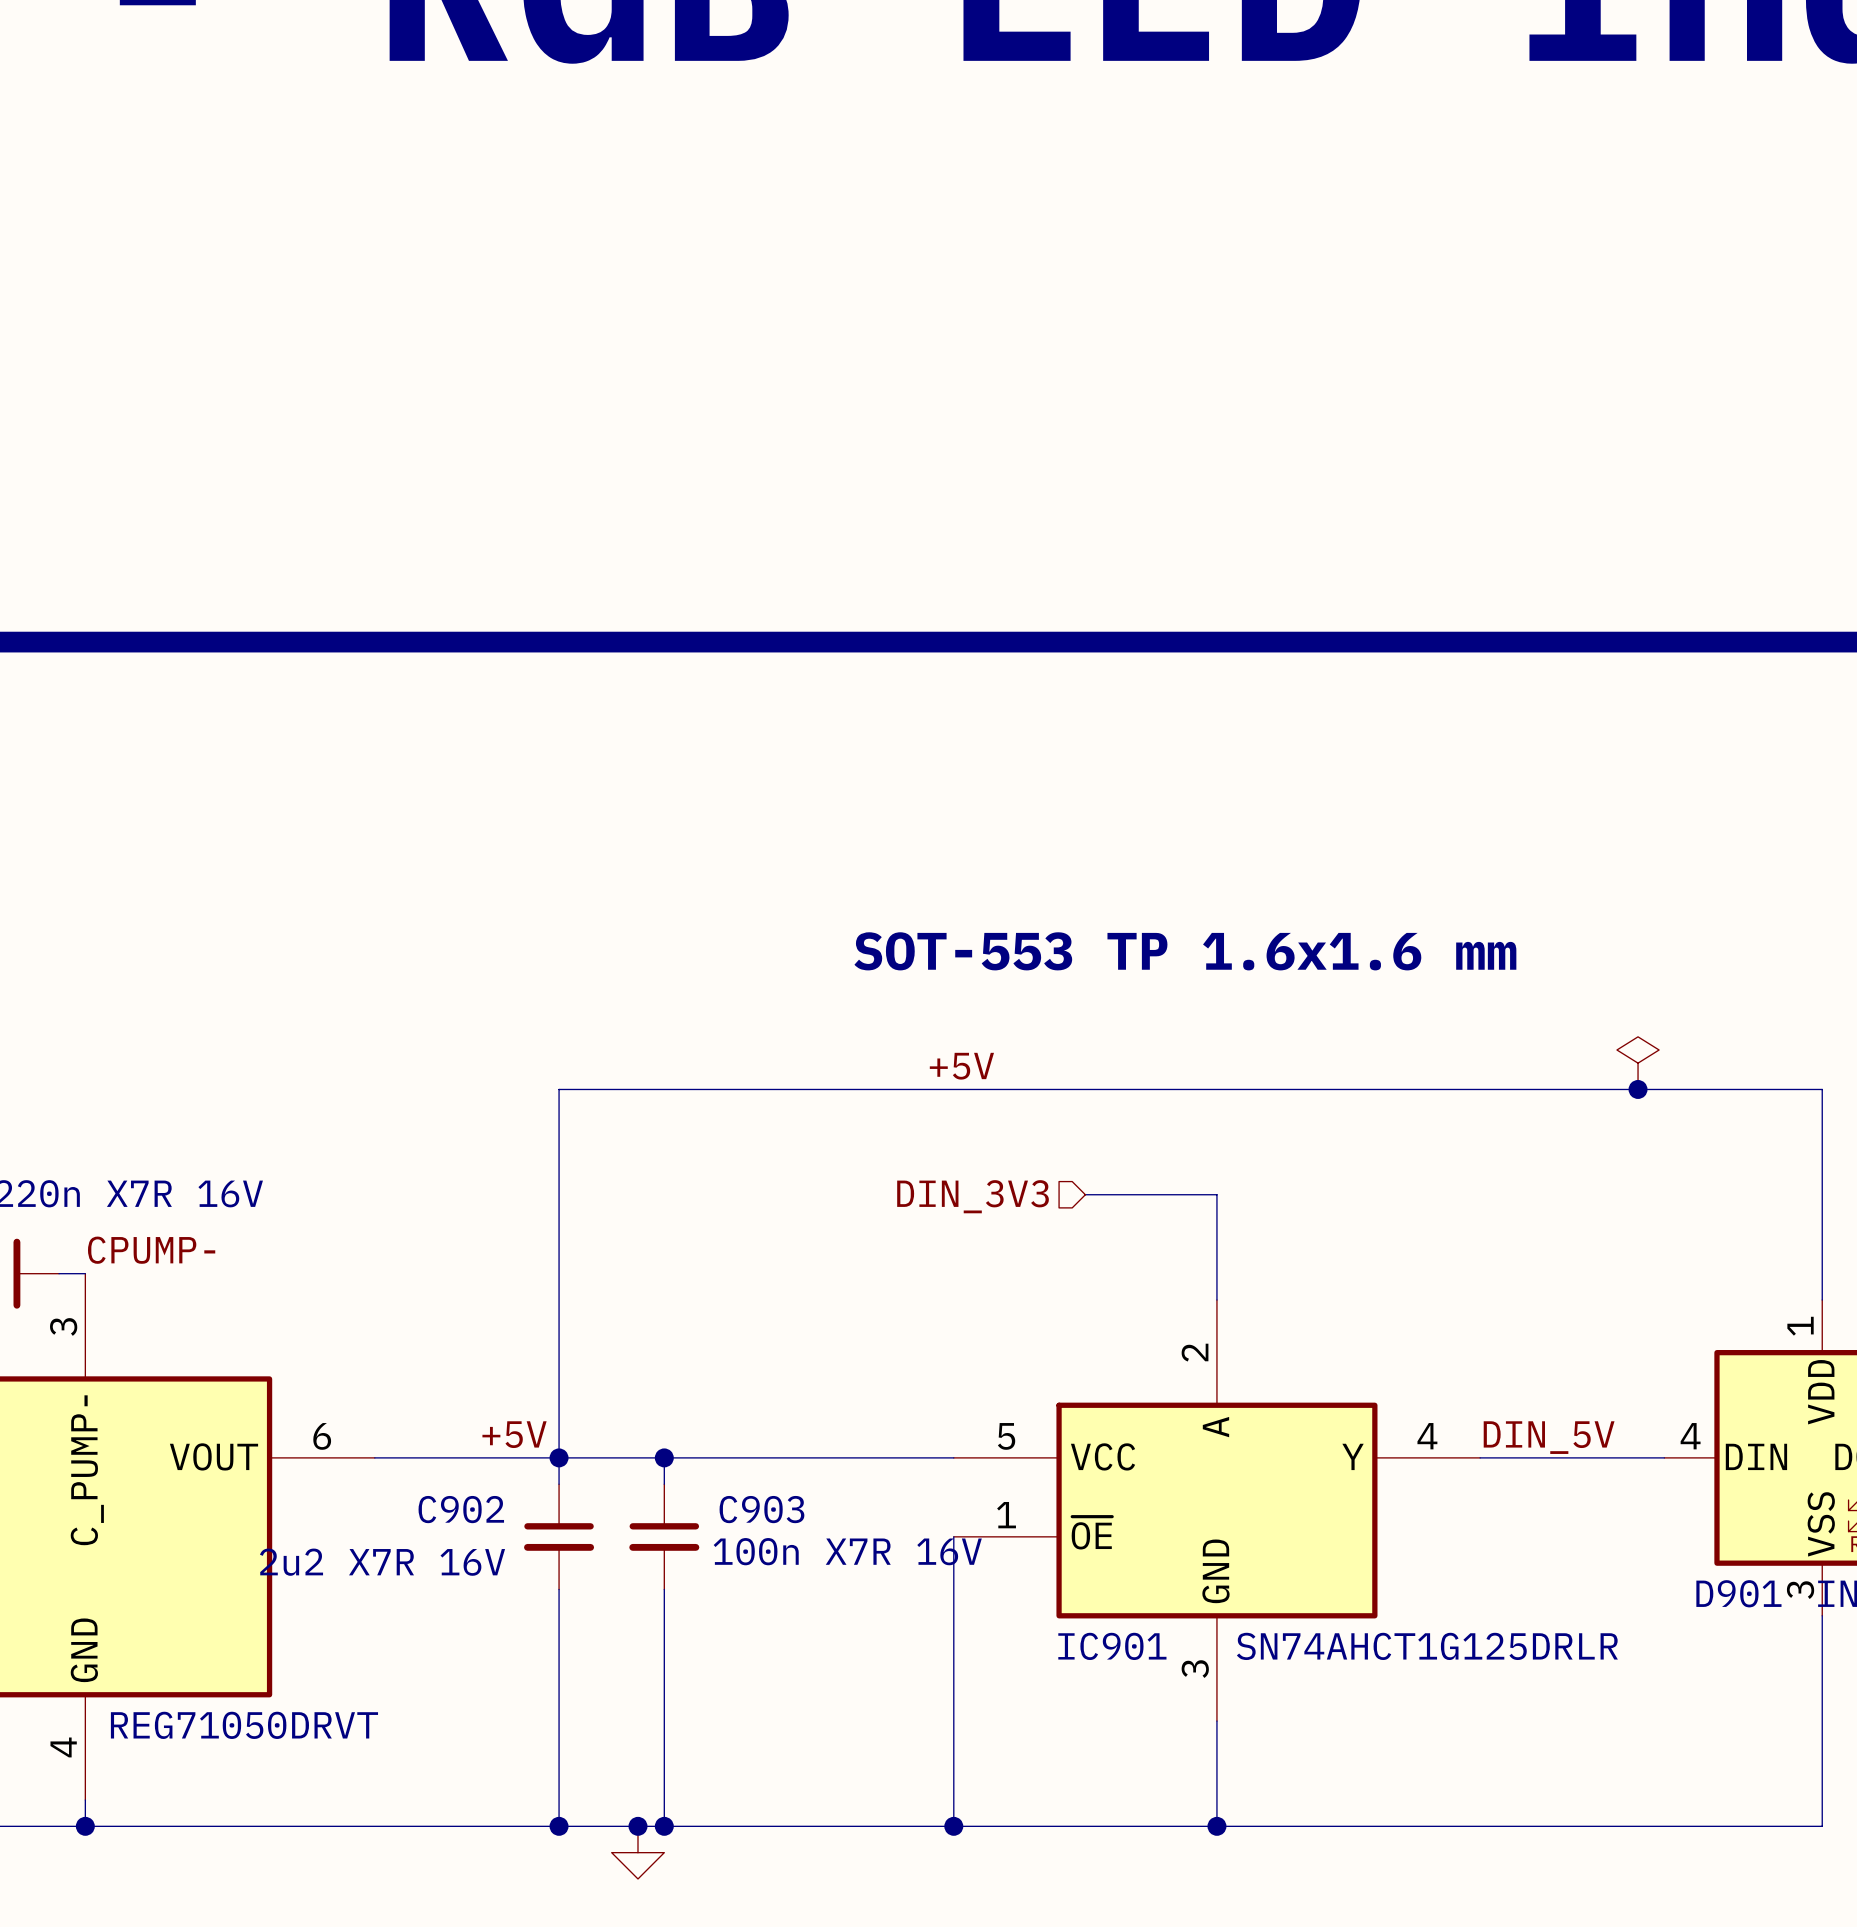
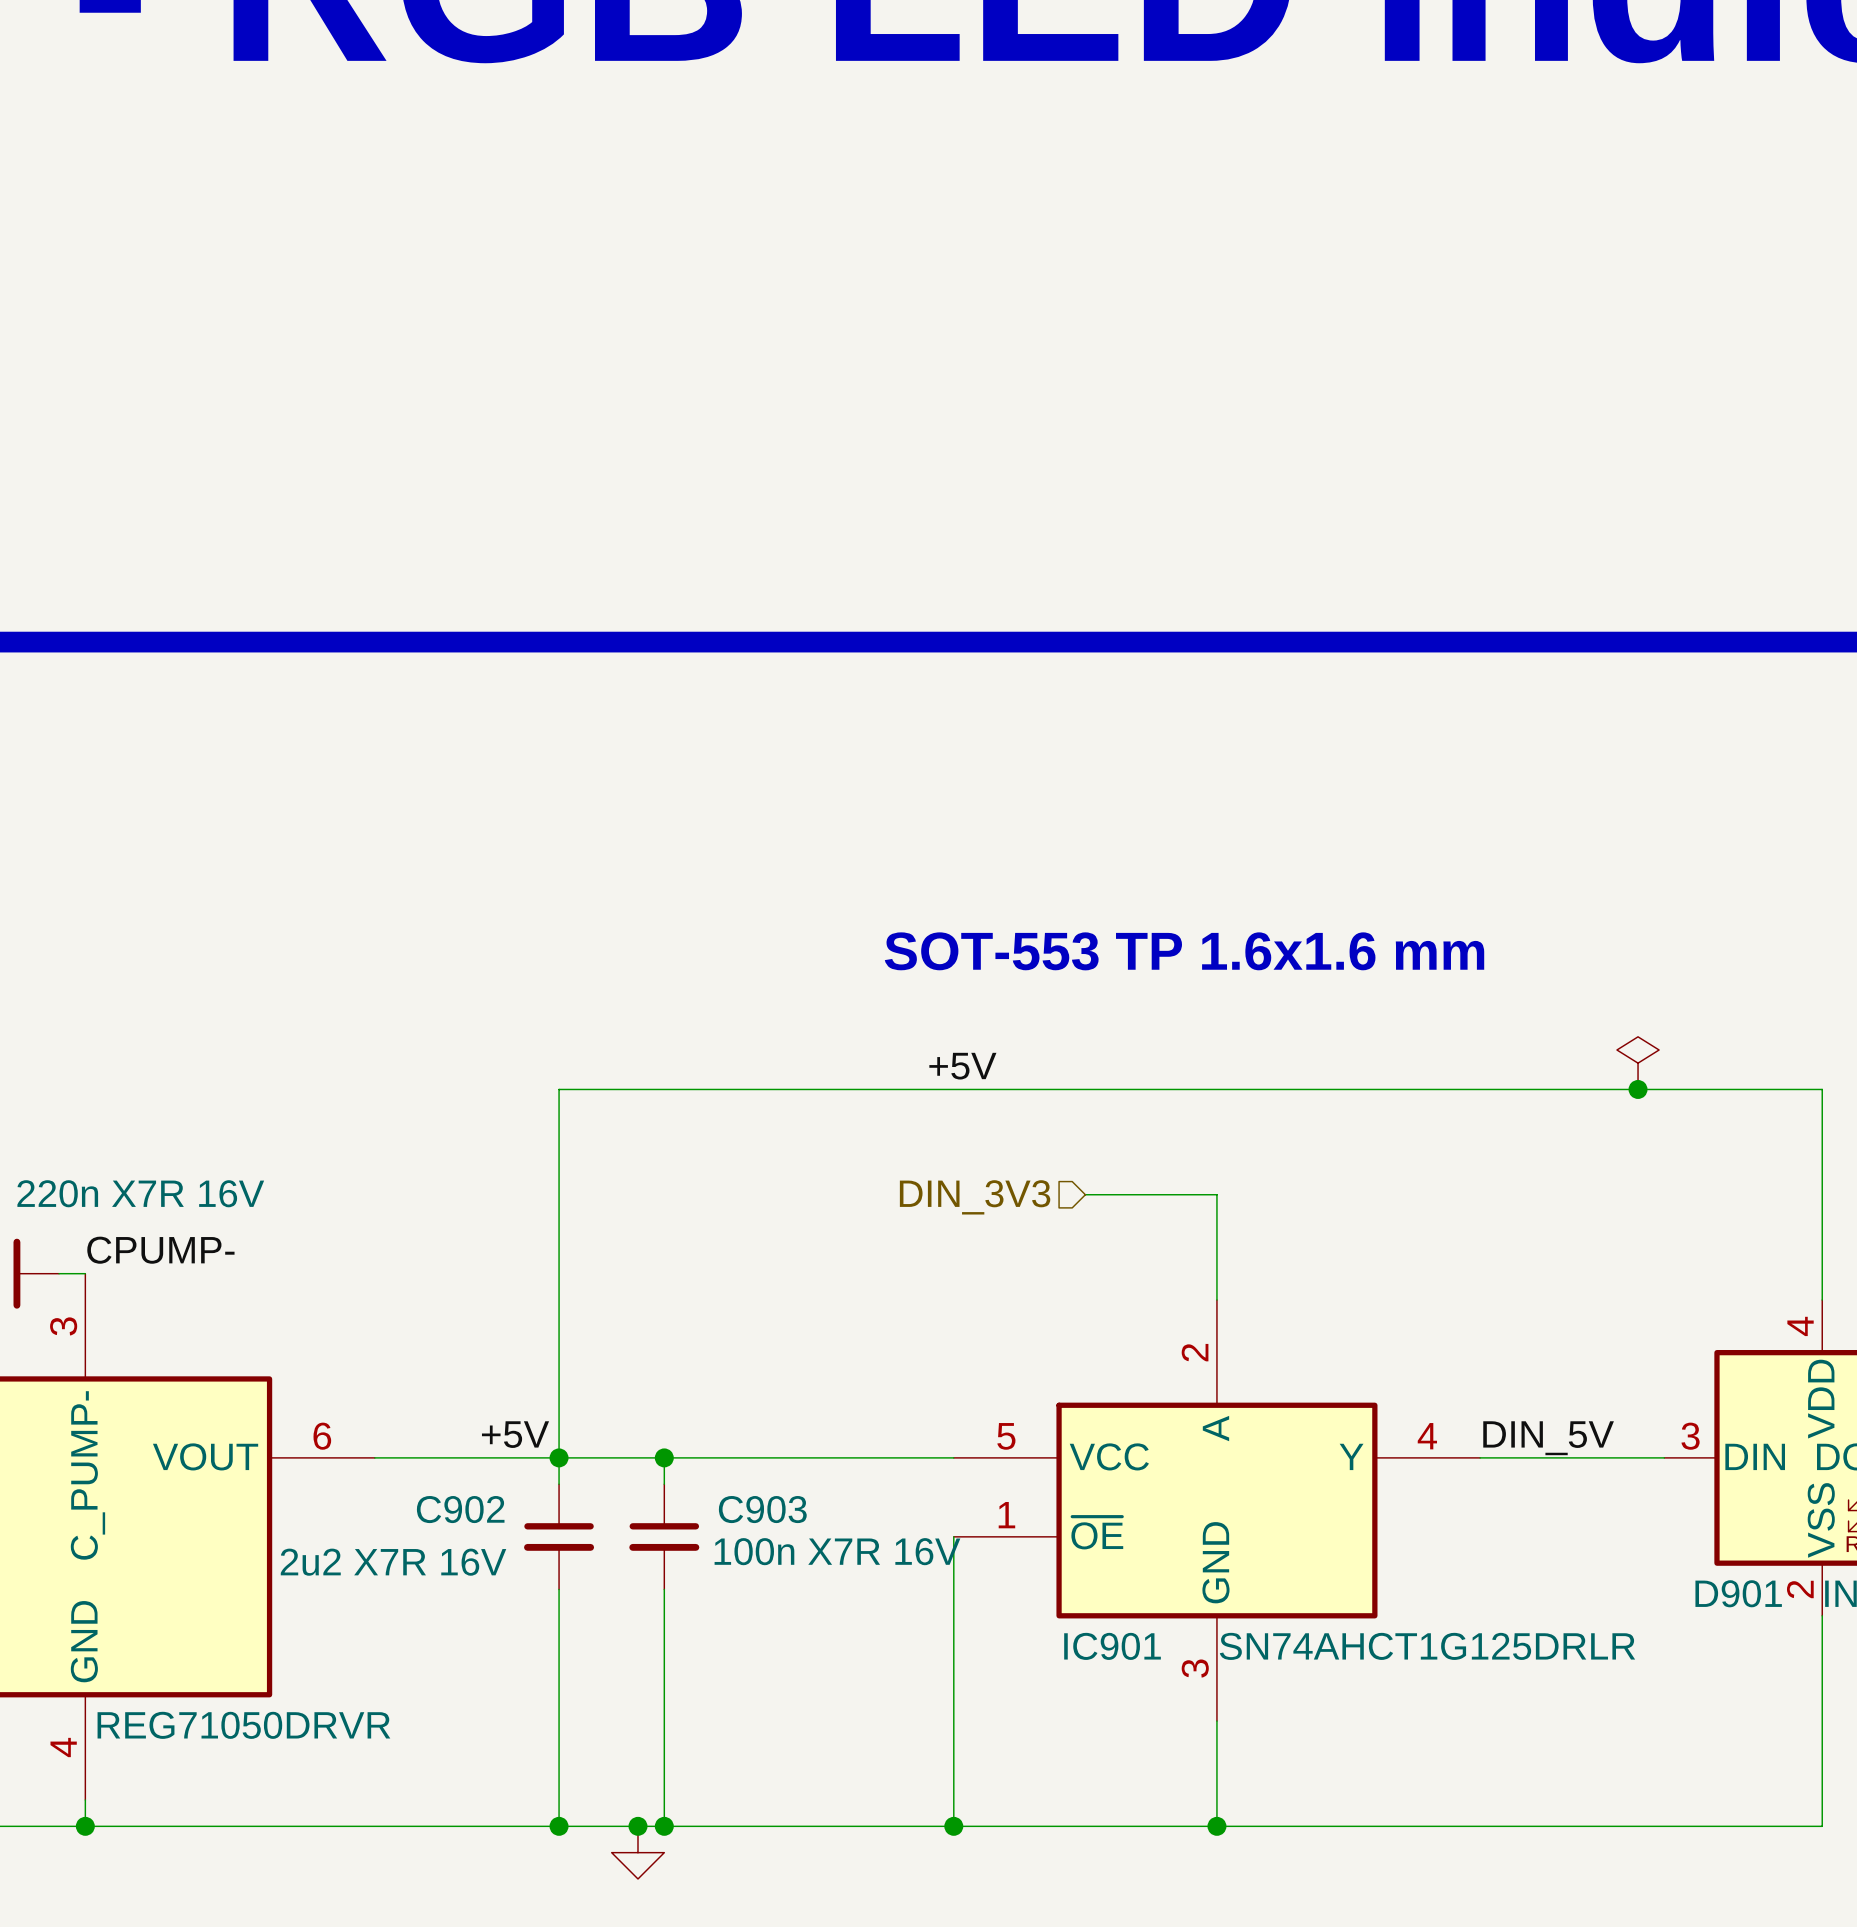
D901 pin number: 1 (1800, 1326) -> 4 (1800, 1326)
D901 pin number: 4 (1690, 1436) -> 3 (1690, 1436)
D901 pin number: 3 (1800, 1590) -> 2 (1800, 1589)
part value: REG71050DRVT (244, 1725) -> REG71050DRVR (243, 1725)

